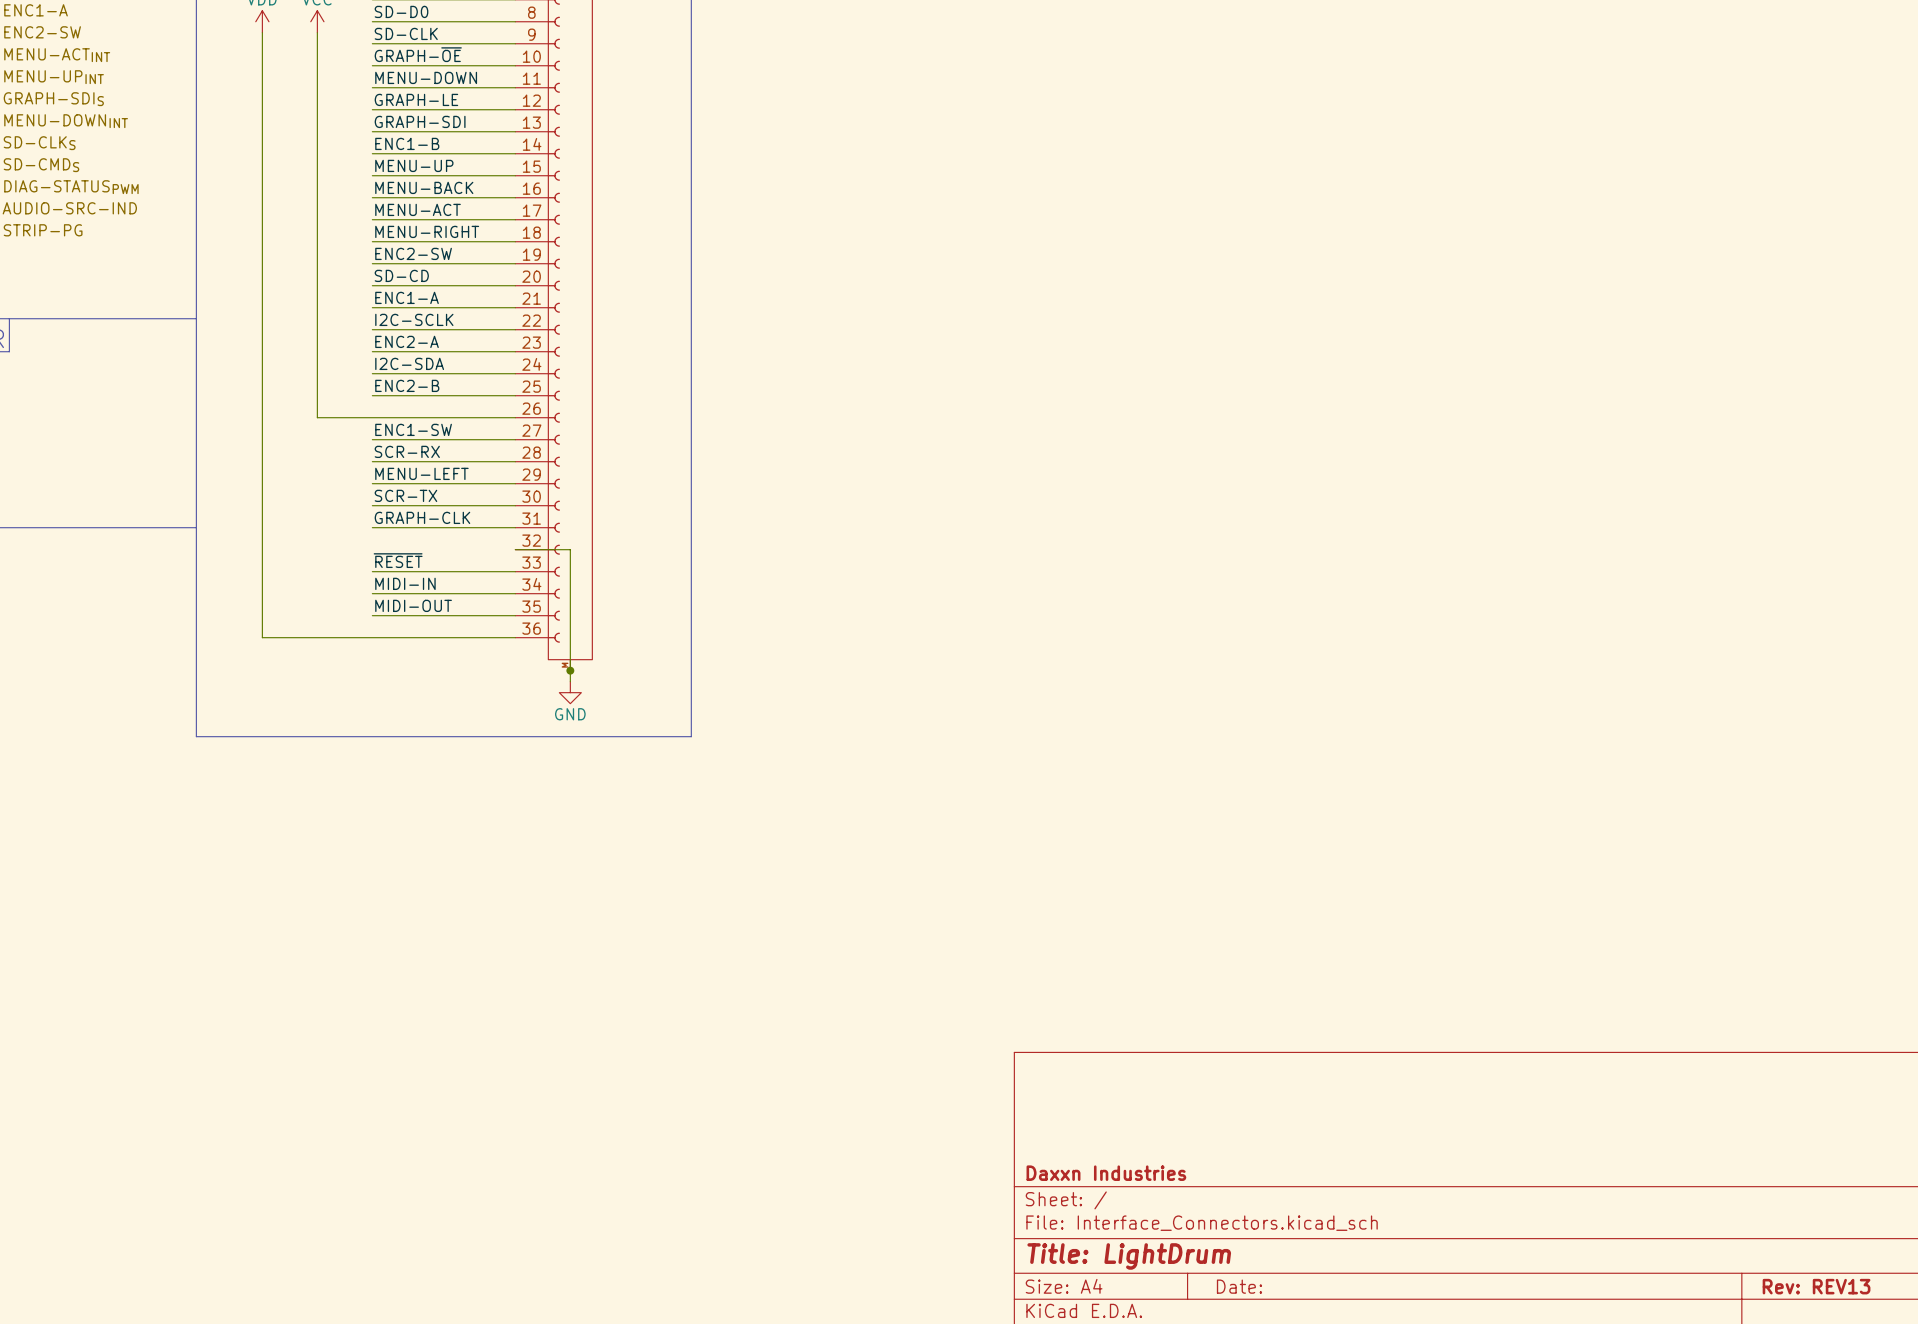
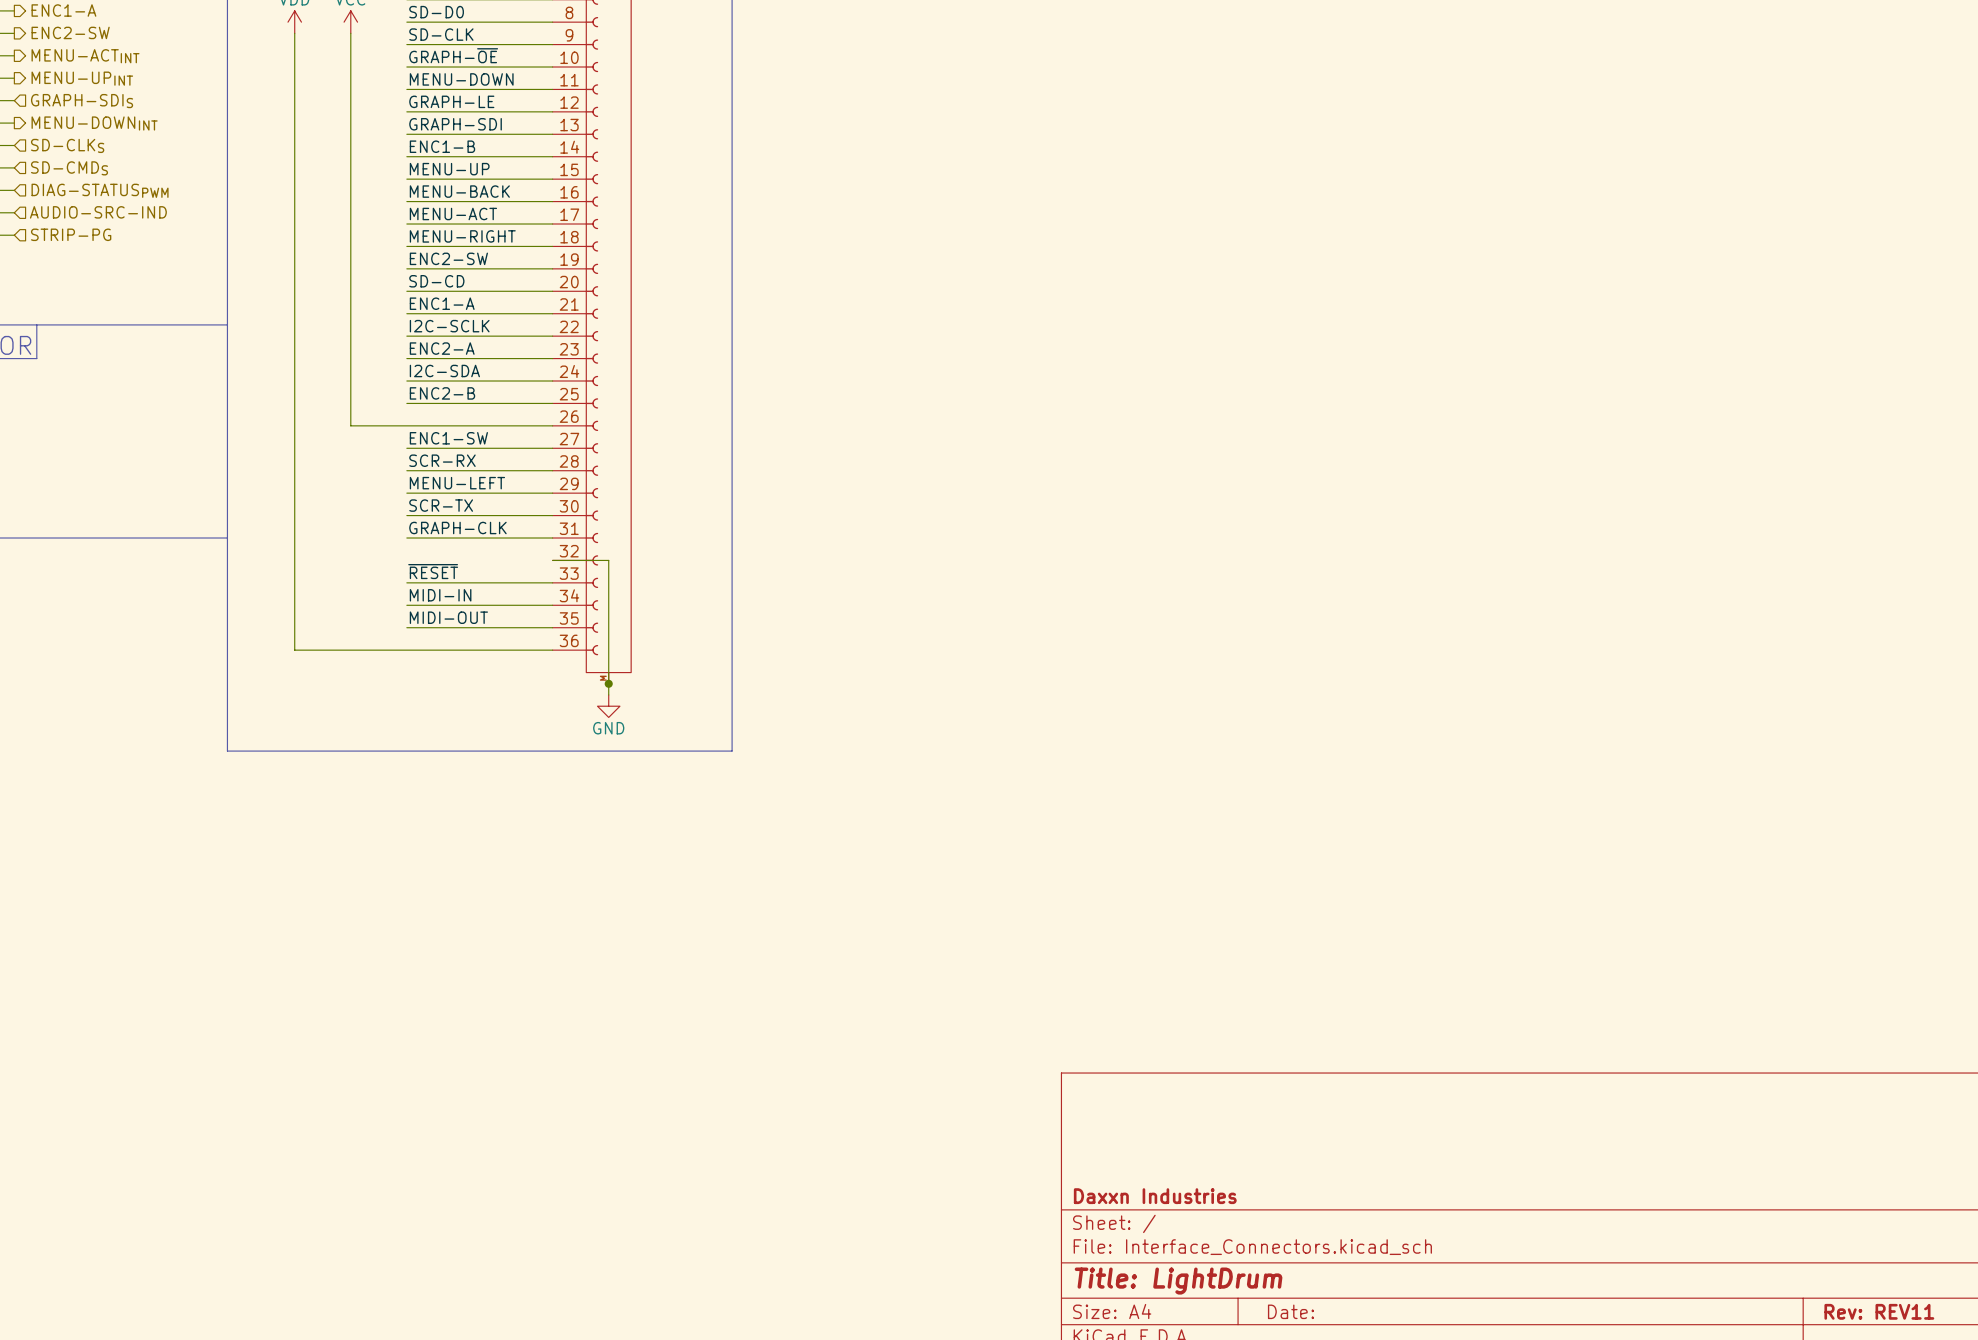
title block: Rev: REV13 (1816, 1286) -> Rev: REV11 (1879, 1311)

